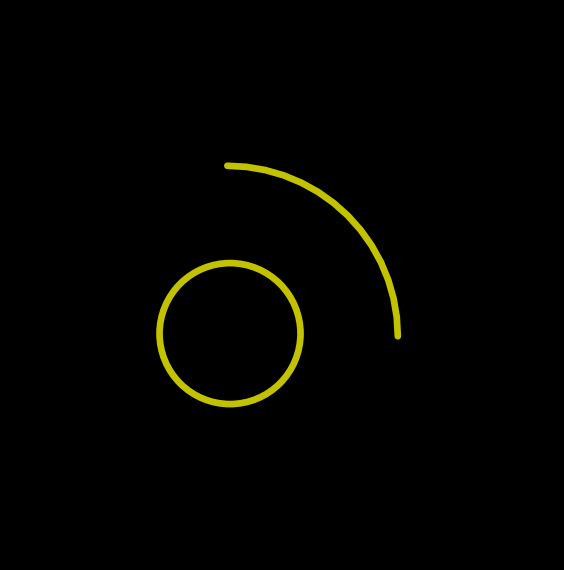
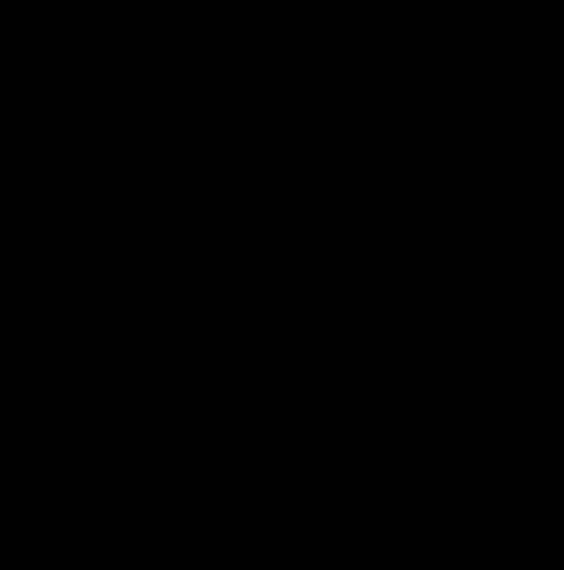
board edge: (227, 165) (265, 170) (283, 175) (318, 191) (347, 215) (371, 245) (388, 279) (393, 298) (397, 336) -> none
round board edge: [156, 259, 304, 408] -> none

